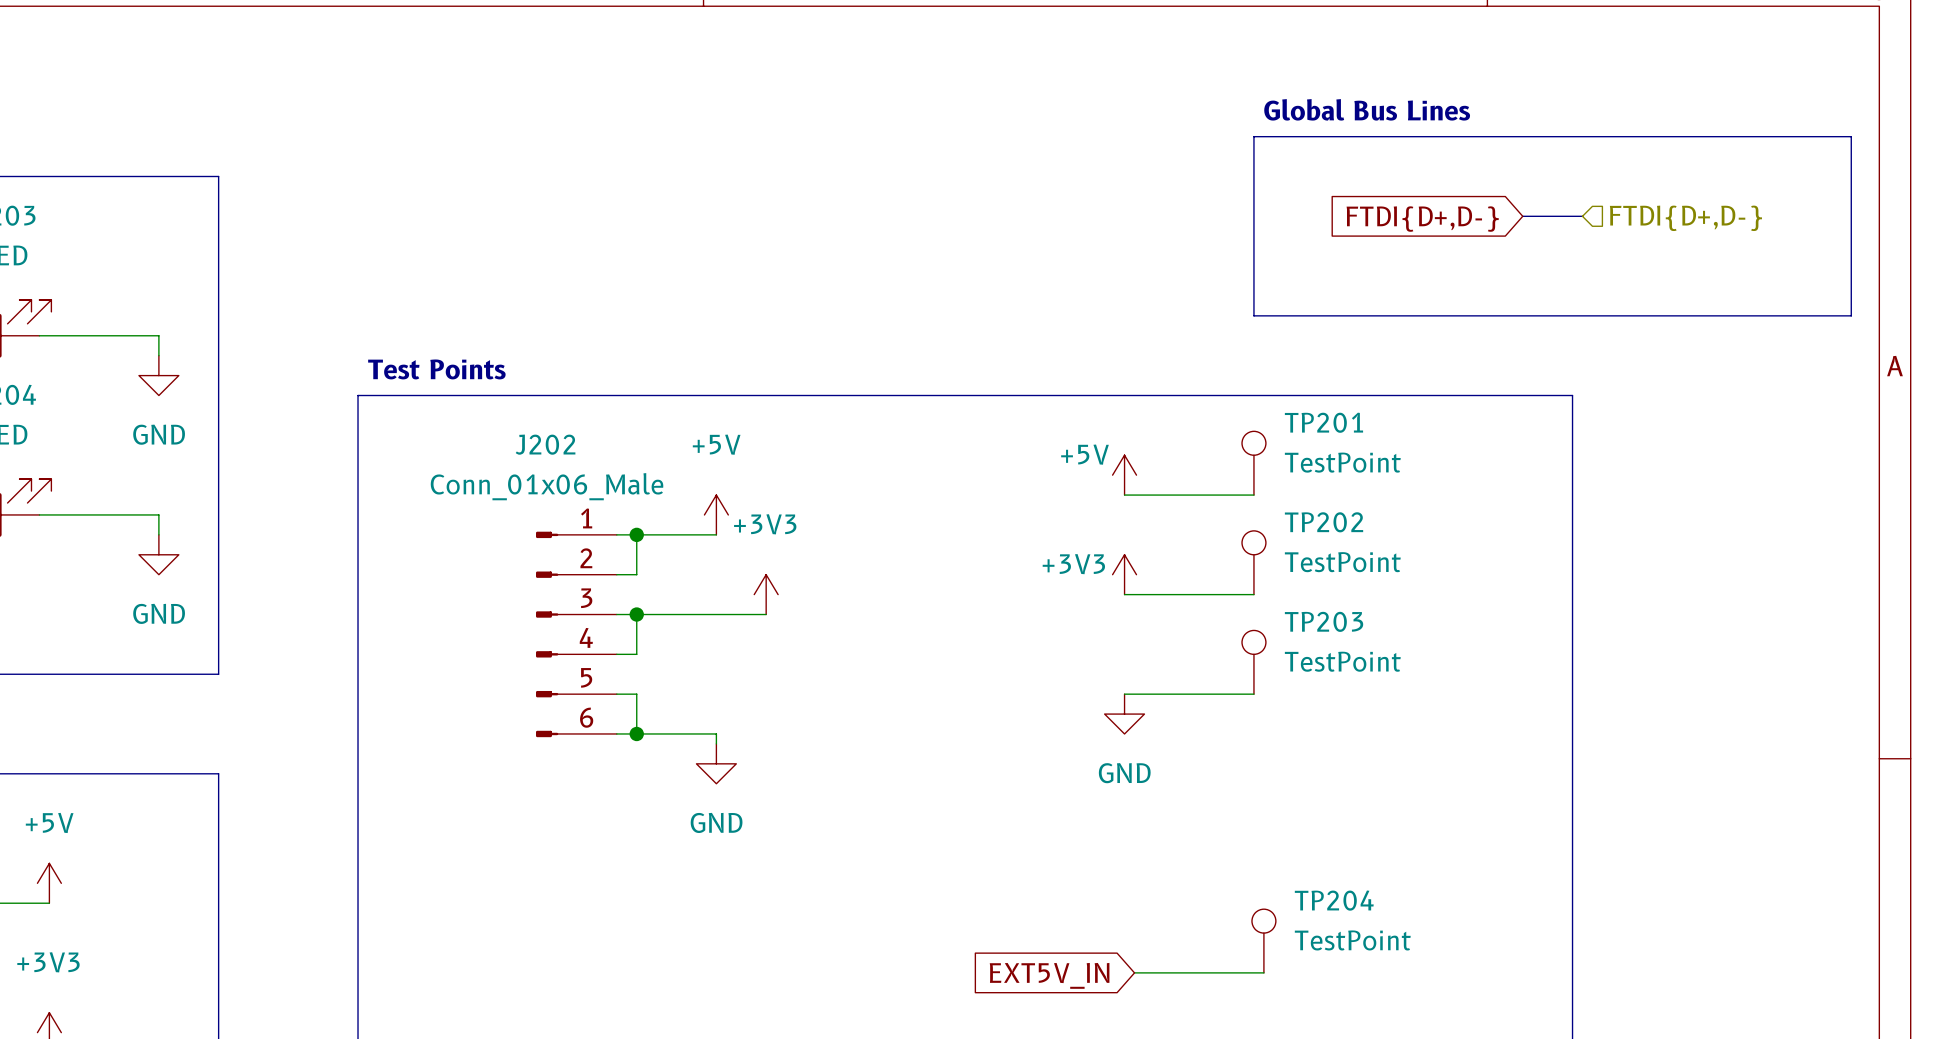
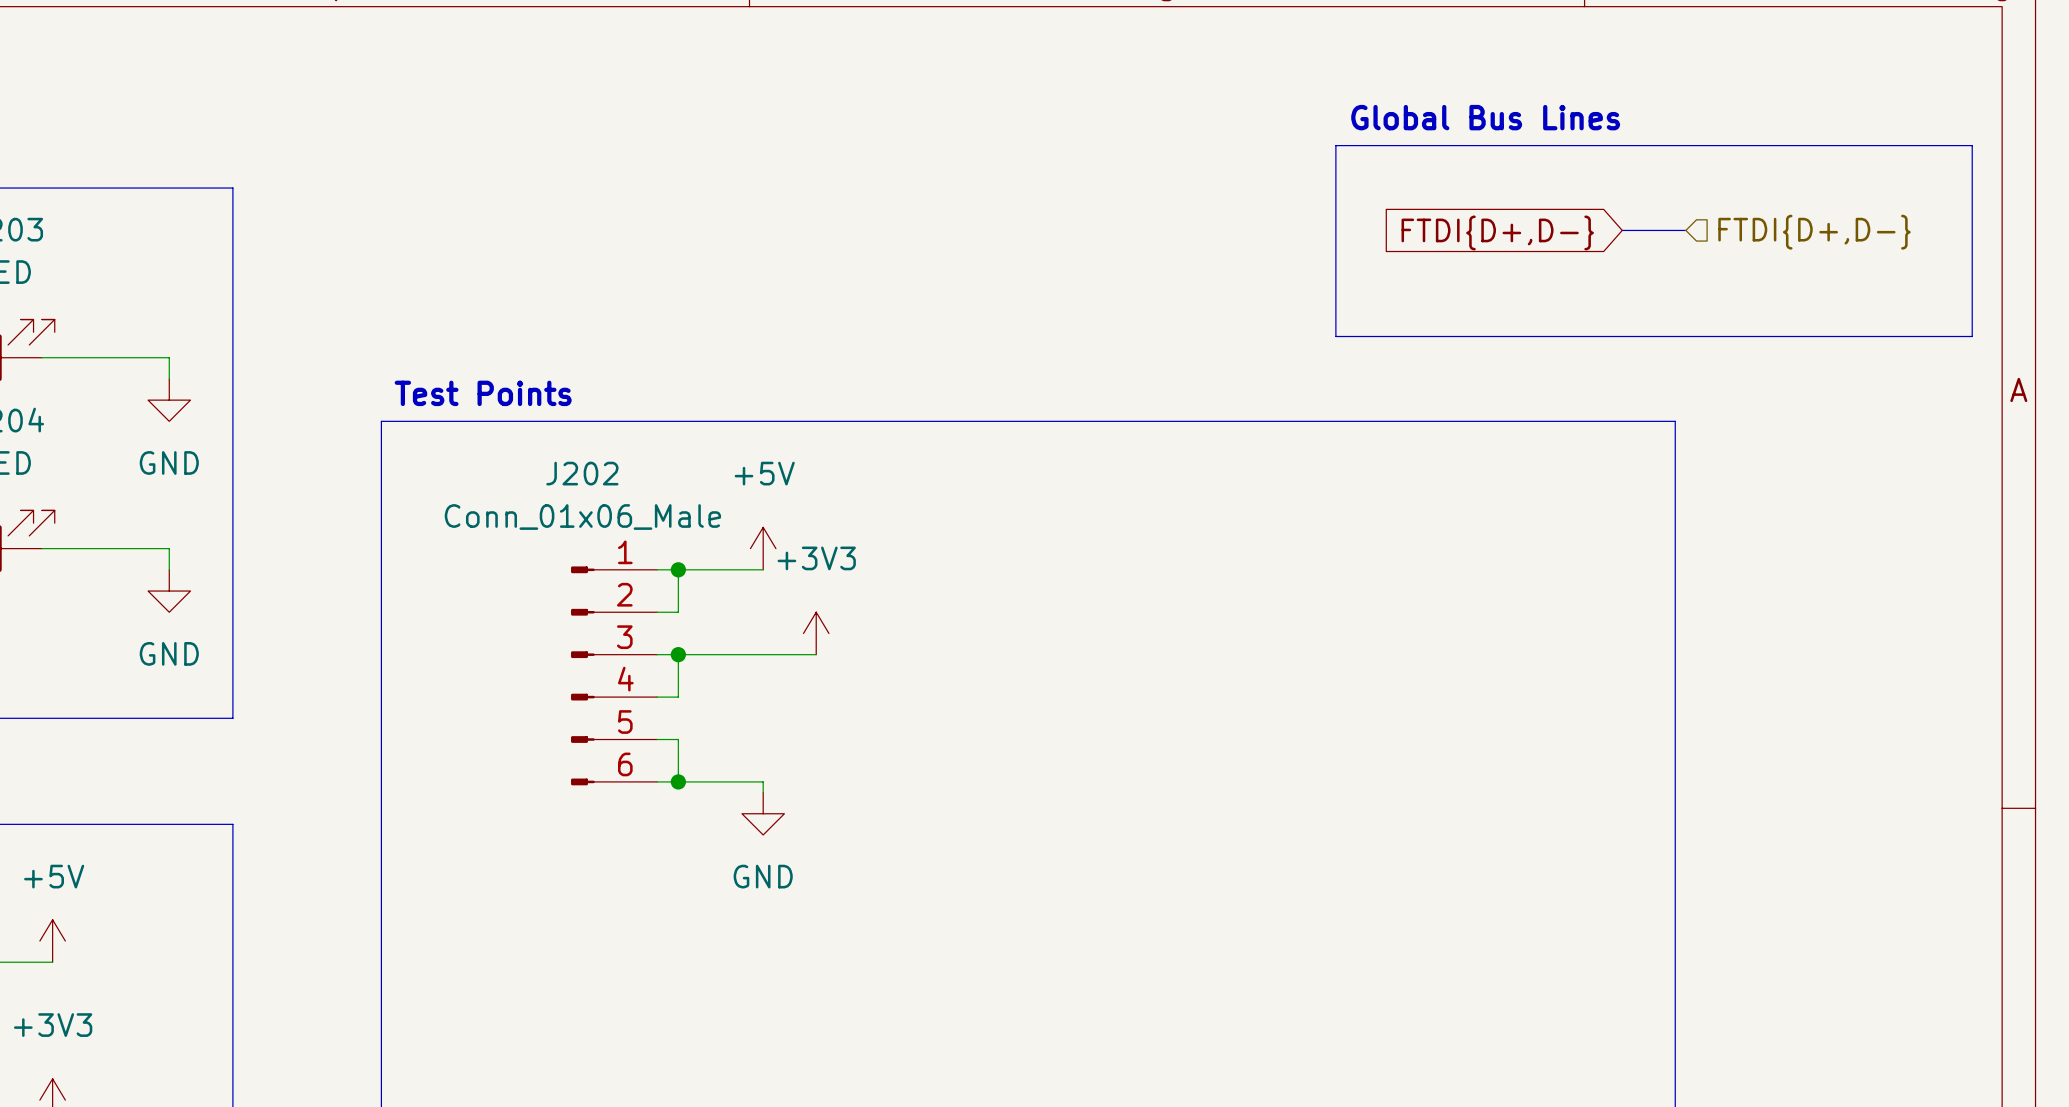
TP201: TestPoint (1253, 463) -> none
power symbol: +5V (1124, 475) -> none
wire: (1124, 495) (1253, 495) -> none
TP202: TestPoint (1253, 562) -> none
power symbol: +3V3 (1124, 574) -> none
wire: (1124, 594) (1253, 594) -> none
TP203: TestPoint (1253, 662) -> none
wire: (1124, 694) (1253, 694) -> none
power symbol: GND (1124, 714) -> none
TP204: TestPoint (1263, 941) -> none
wire: (1134, 972) (1263, 972) -> none
global label: EXT5V_IN (1049, 975) -> none

